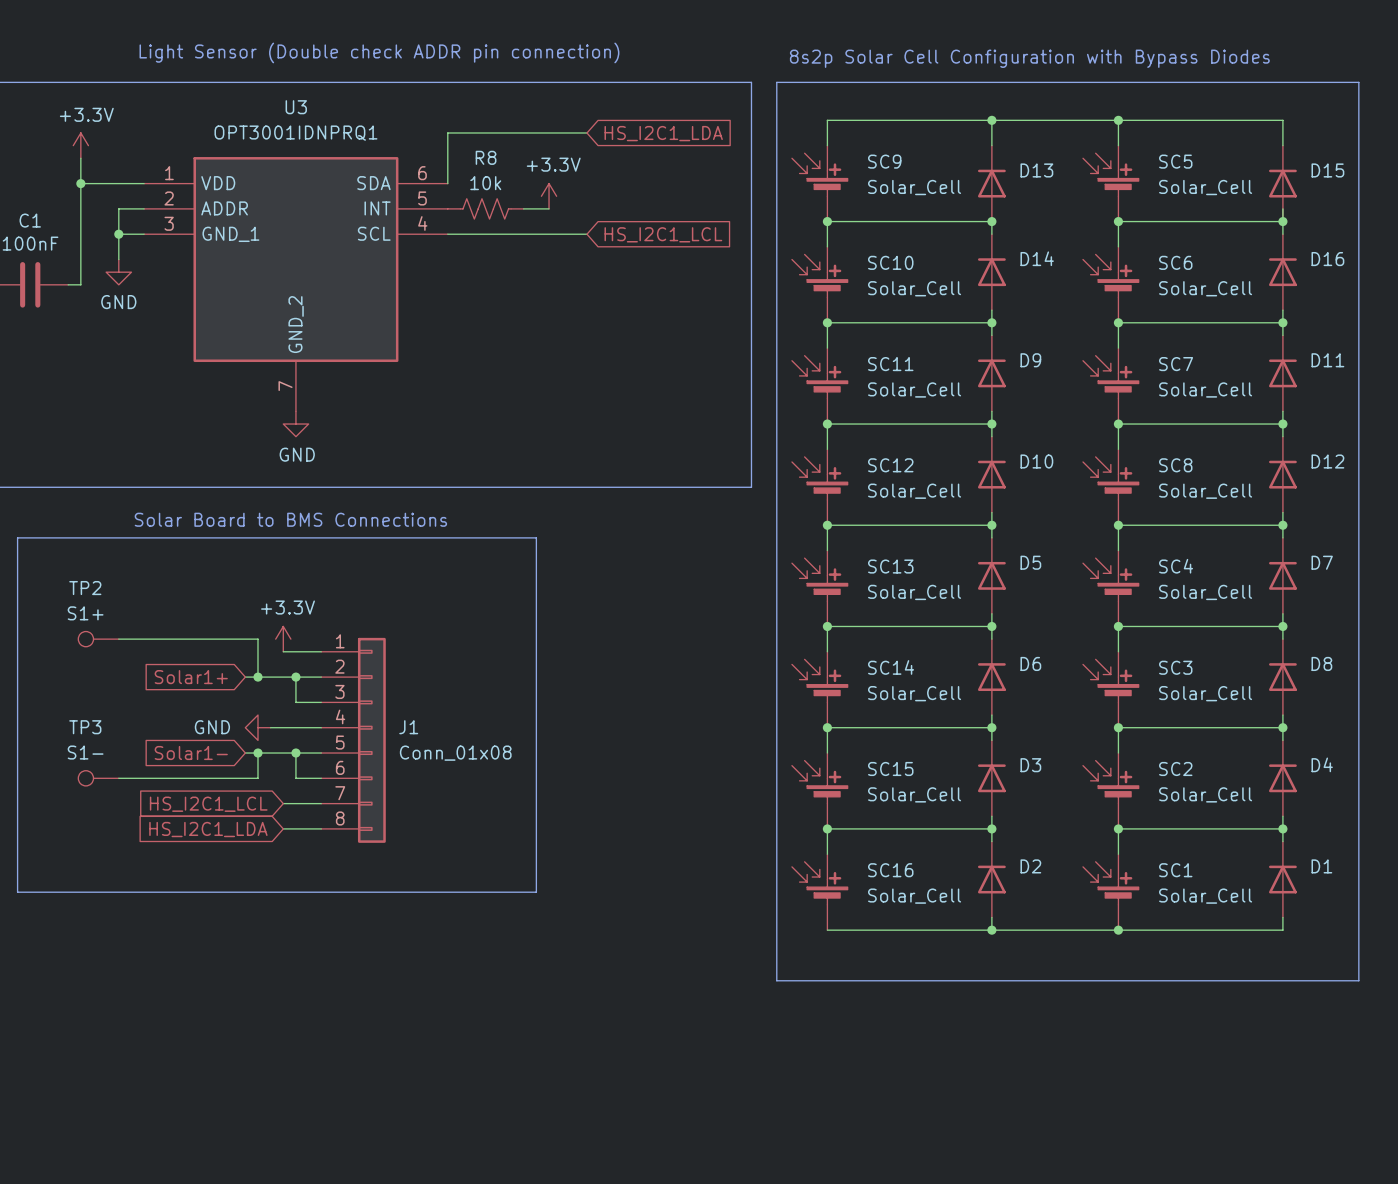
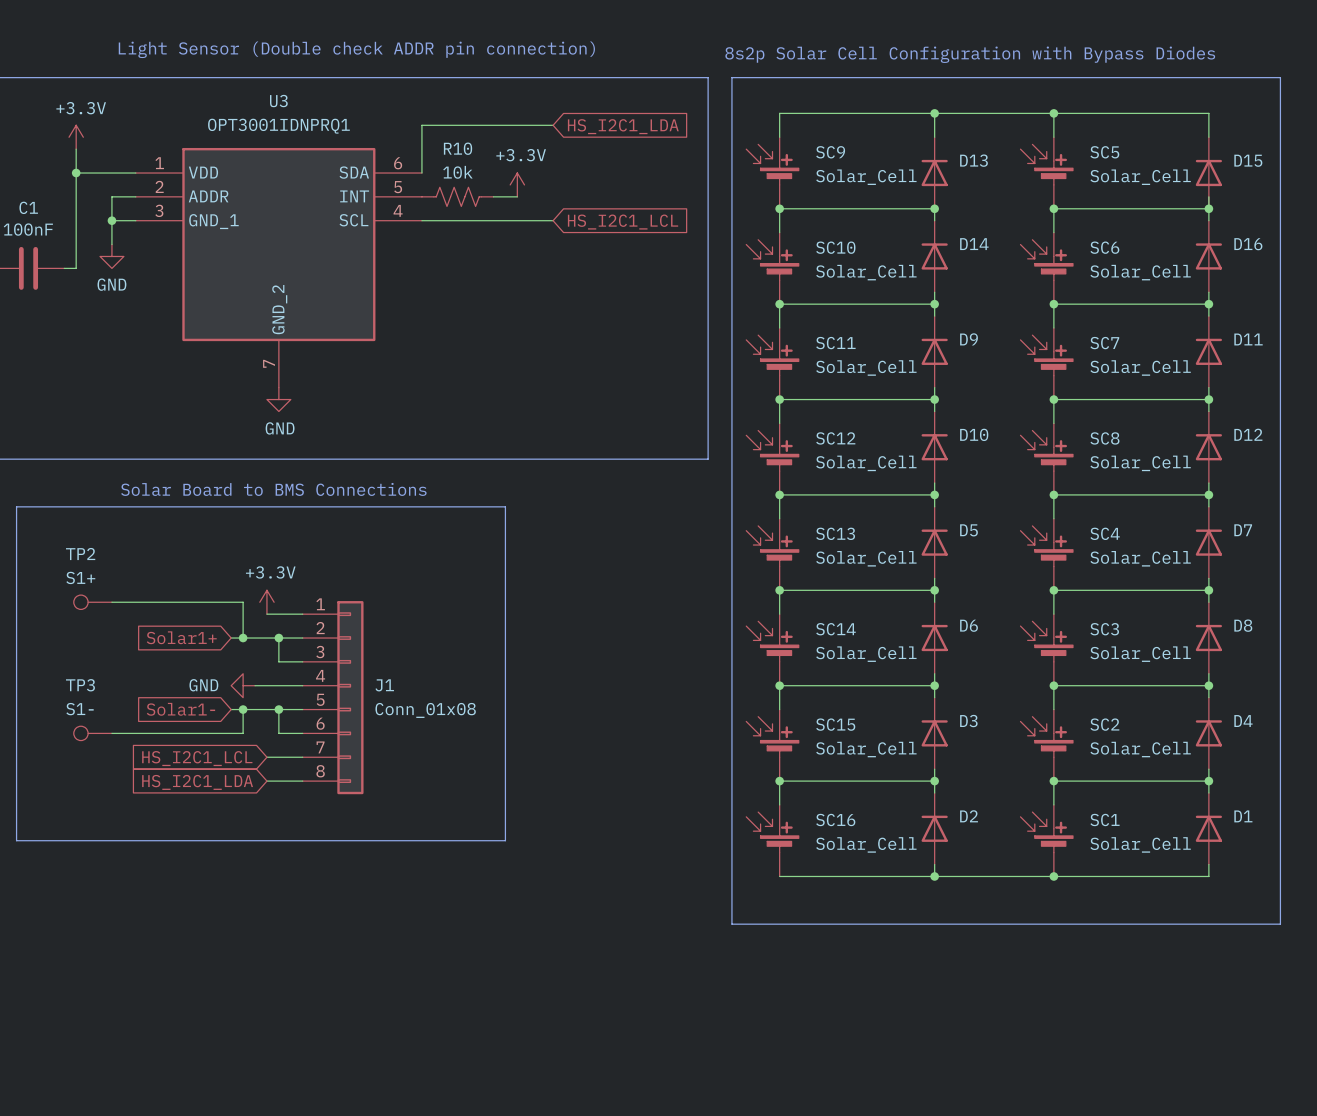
R8 name: R8 (486, 157) -> R10 (458, 148)

